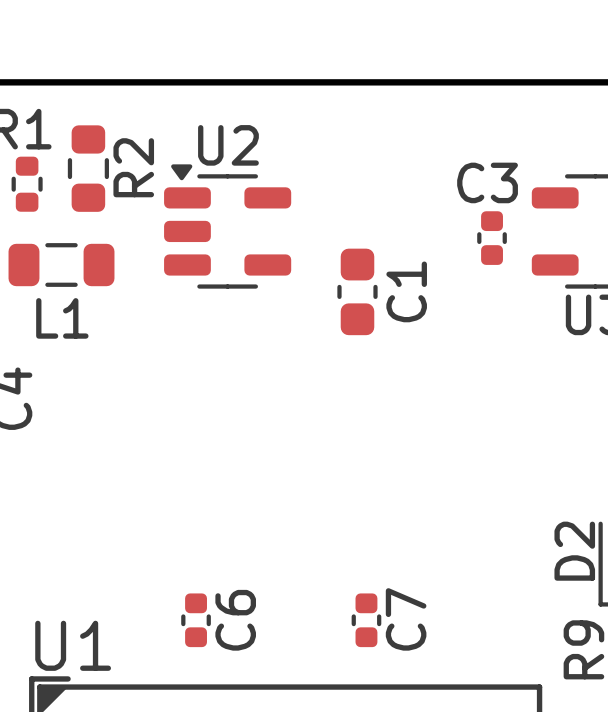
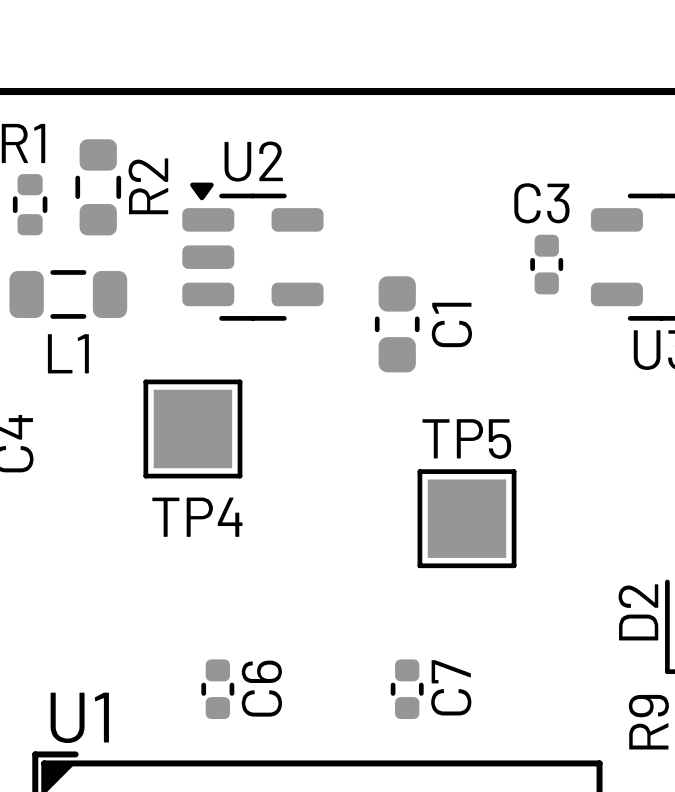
TP4: none -> (192, 429)
TP5: none -> (466, 518)

